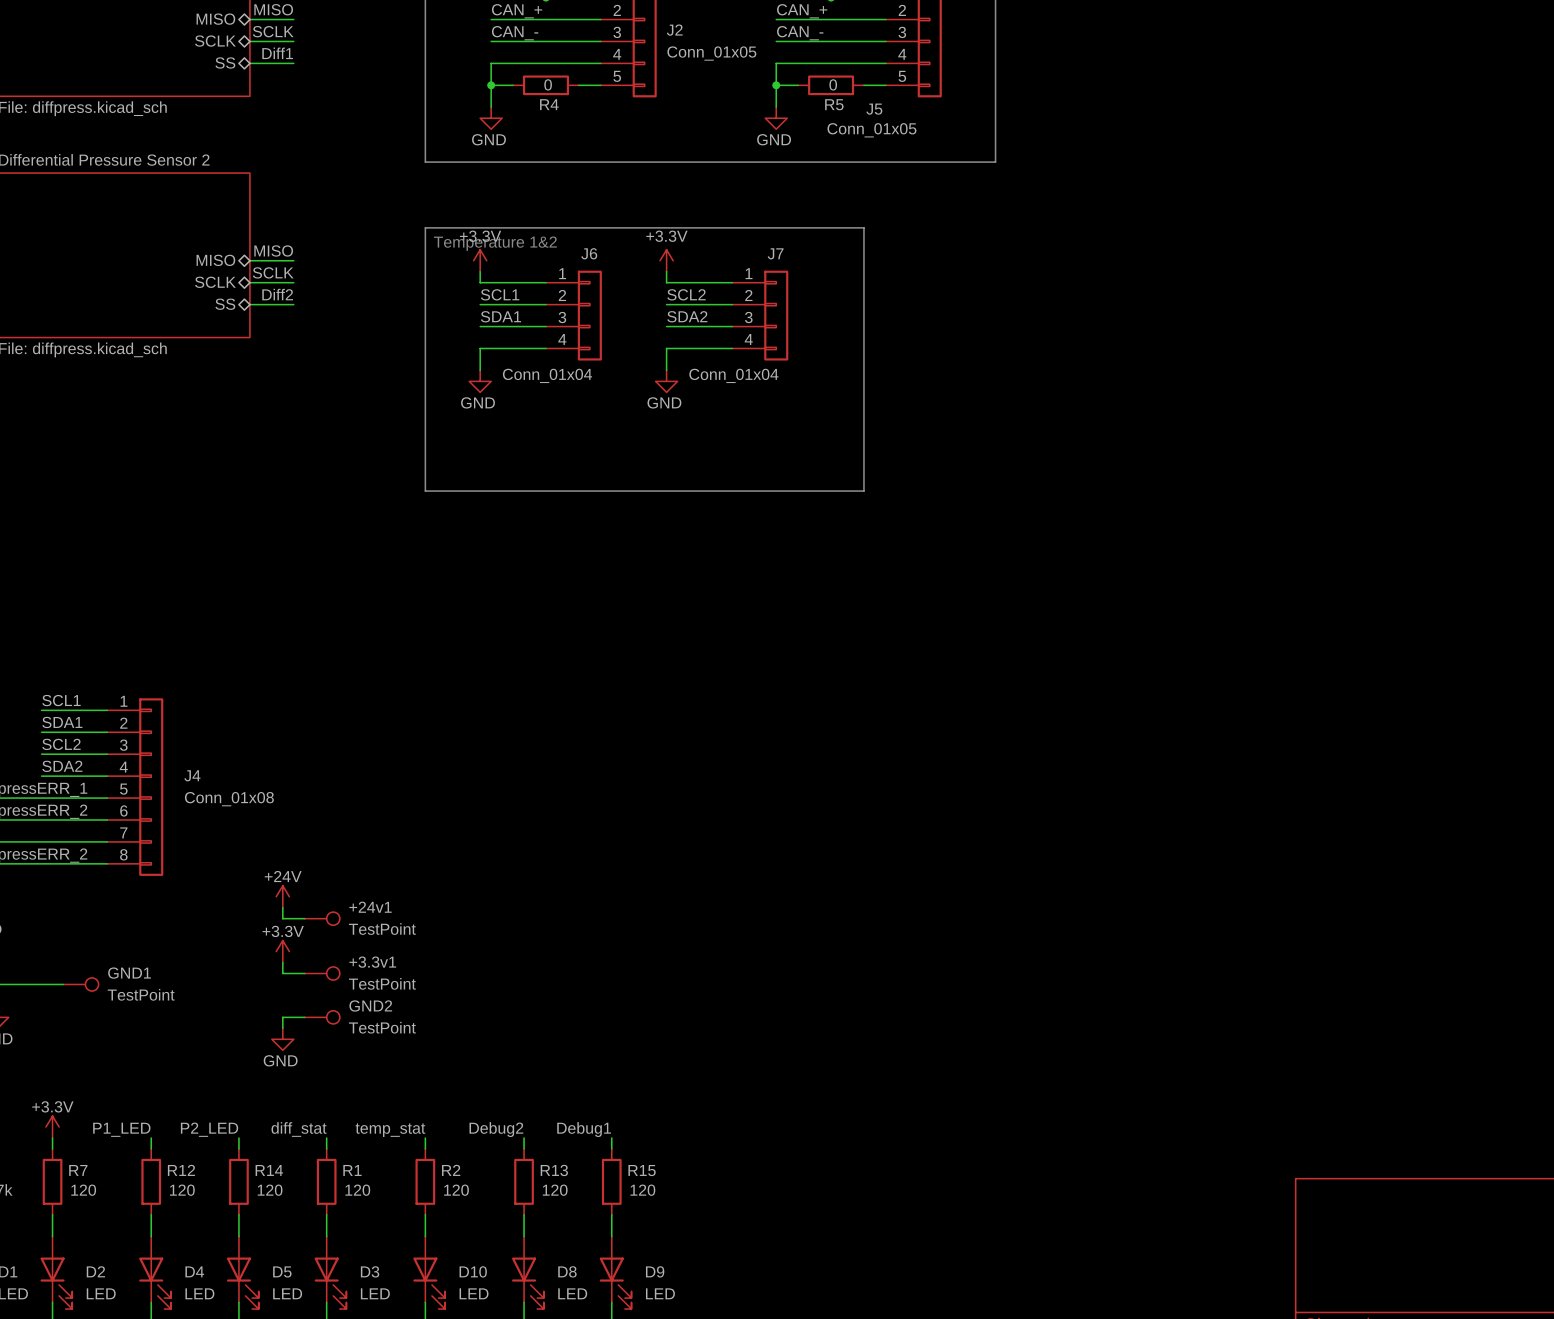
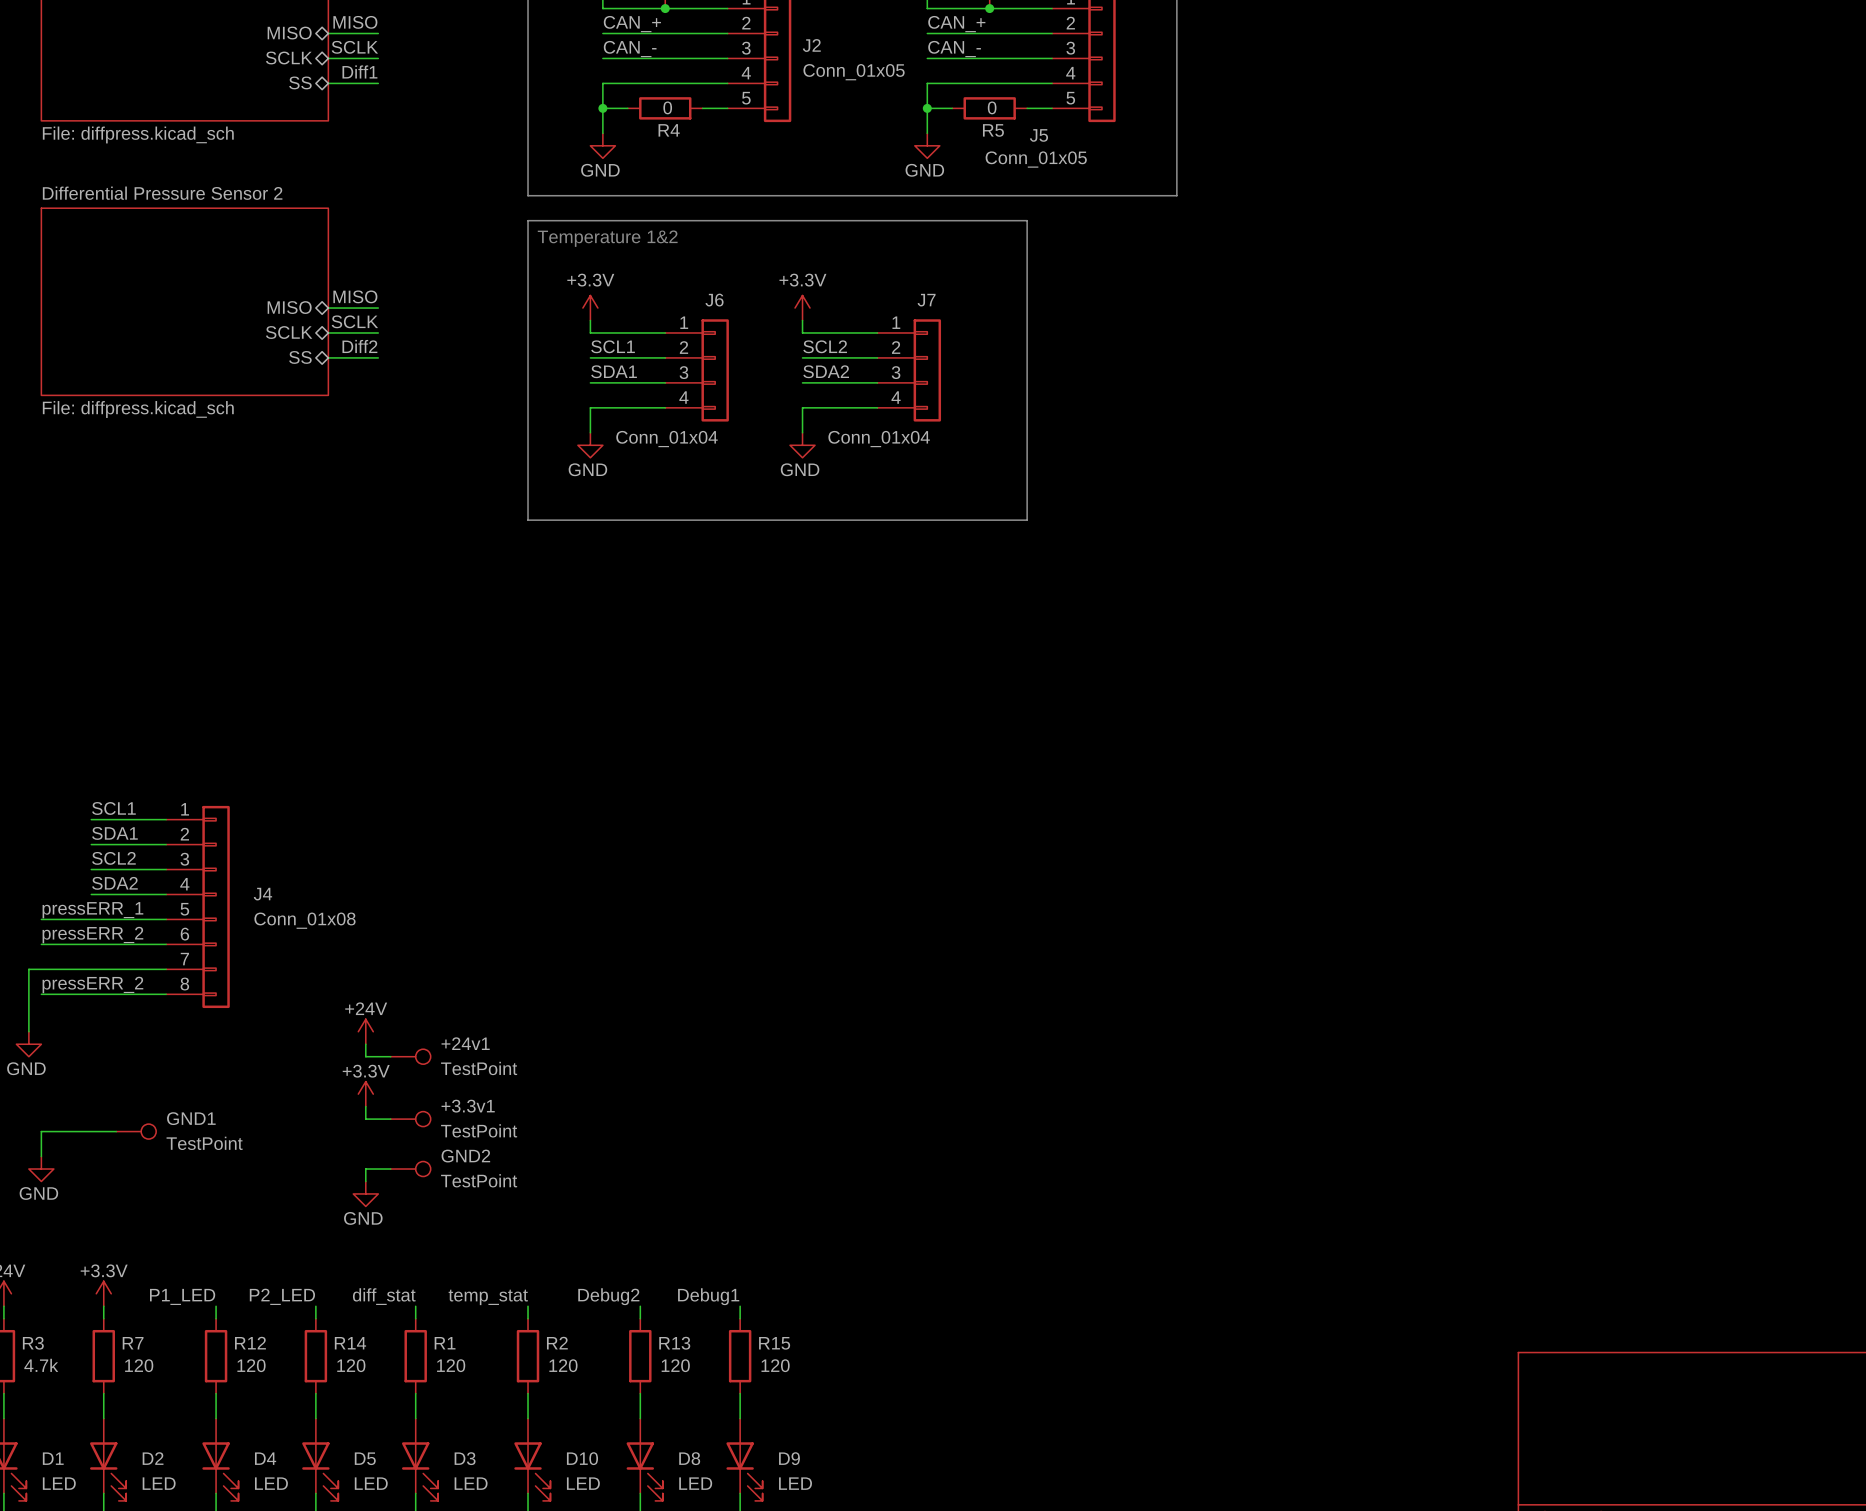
line: (425, 227) (863, 227) -> (528, 270) (528, 220) (1027, 220) (1027, 270)
text position: Temperature 1&2 (495, 243) -> Temperature 1&2 (607, 238)
line: (425, 447) (425, 491) (863, 491) (863, 447) -> (528, 520) (1027, 520)

